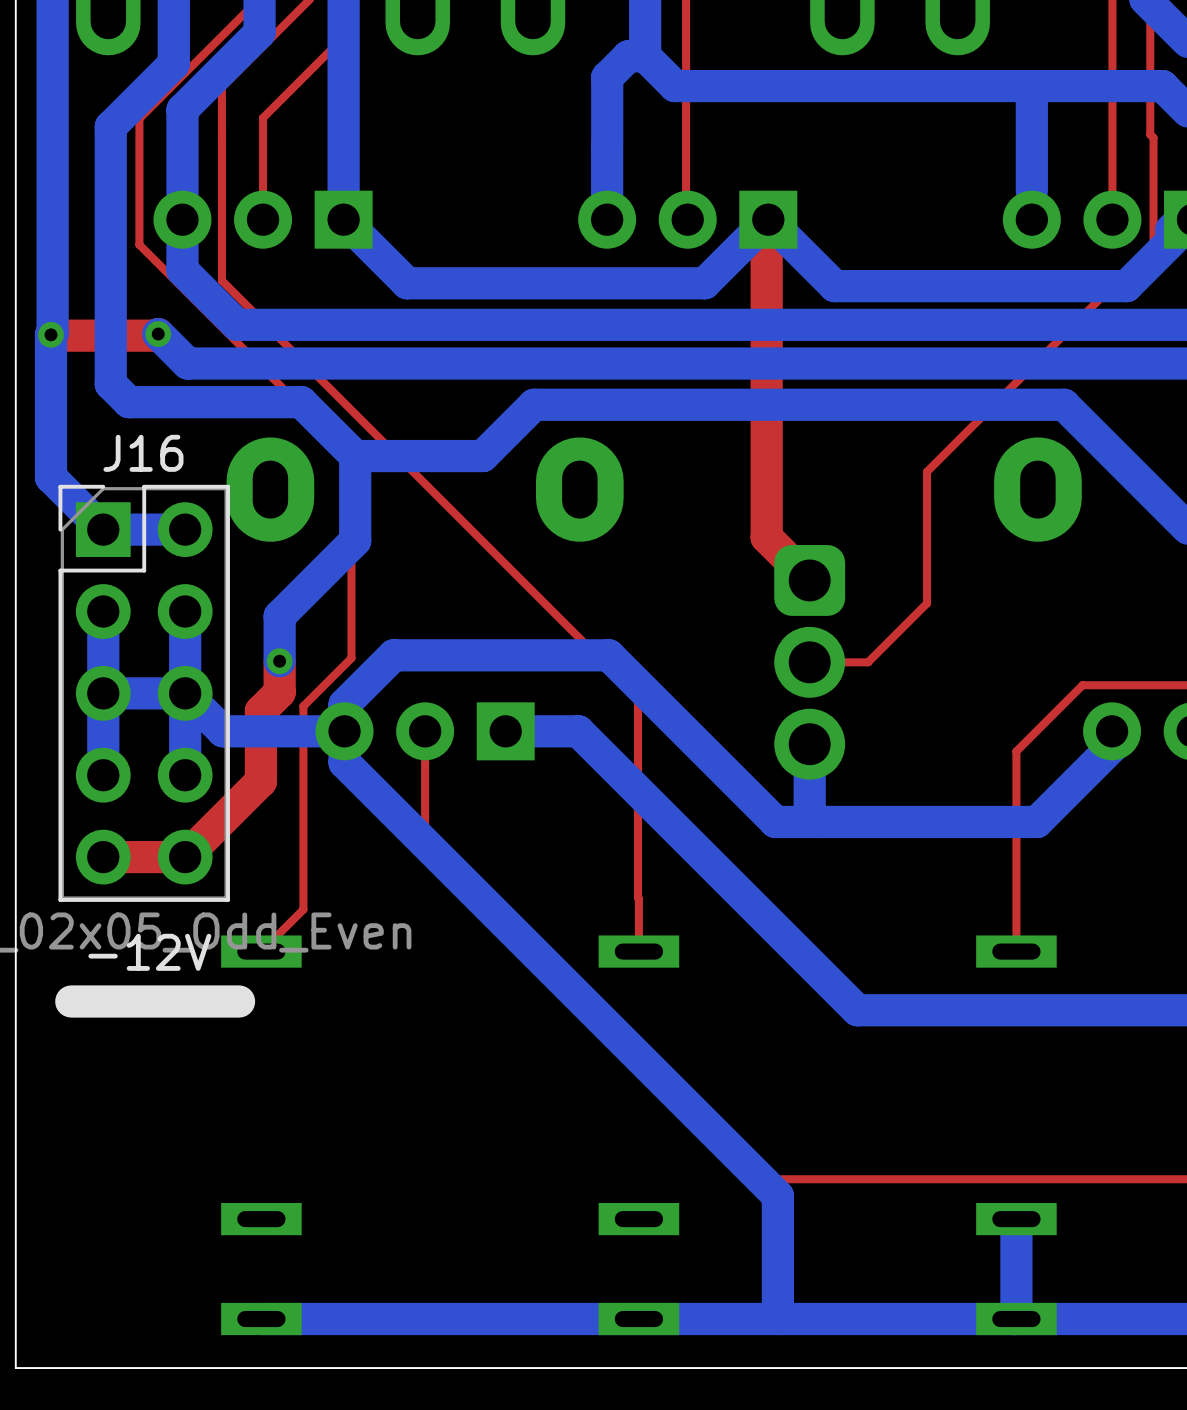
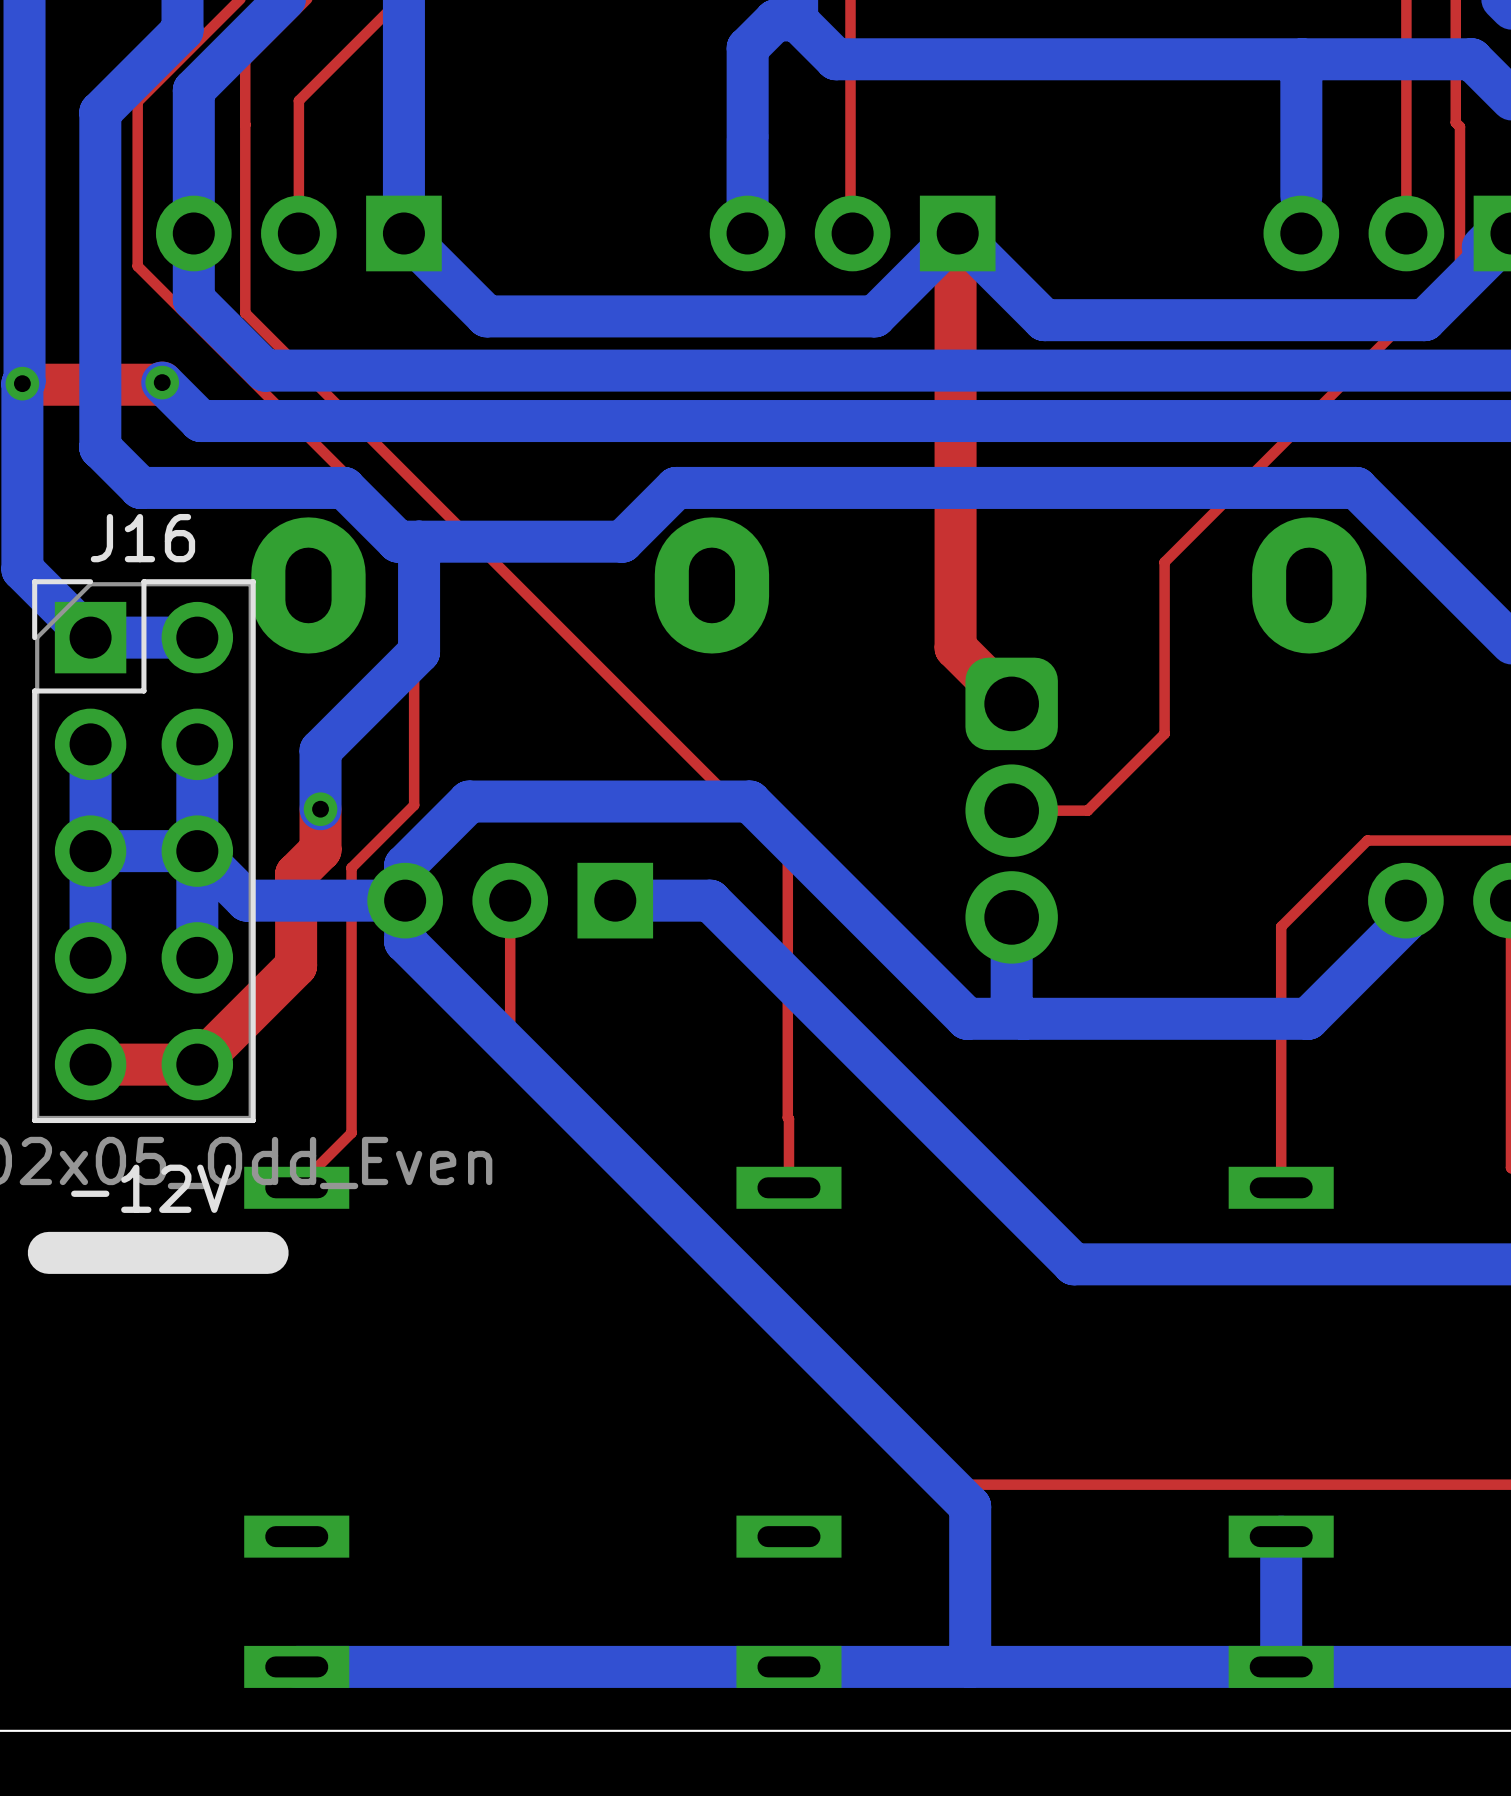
bottom track: (128, 402) (301, 402) (355, 456) -> (124, 471) (140, 487) (344, 487) (398, 541) (419, 541)
bottom track: (1074, 414) (1064, 404) (534, 404) (482, 456) -> (1356, 487) (676, 487) (622, 541) (585, 541)

